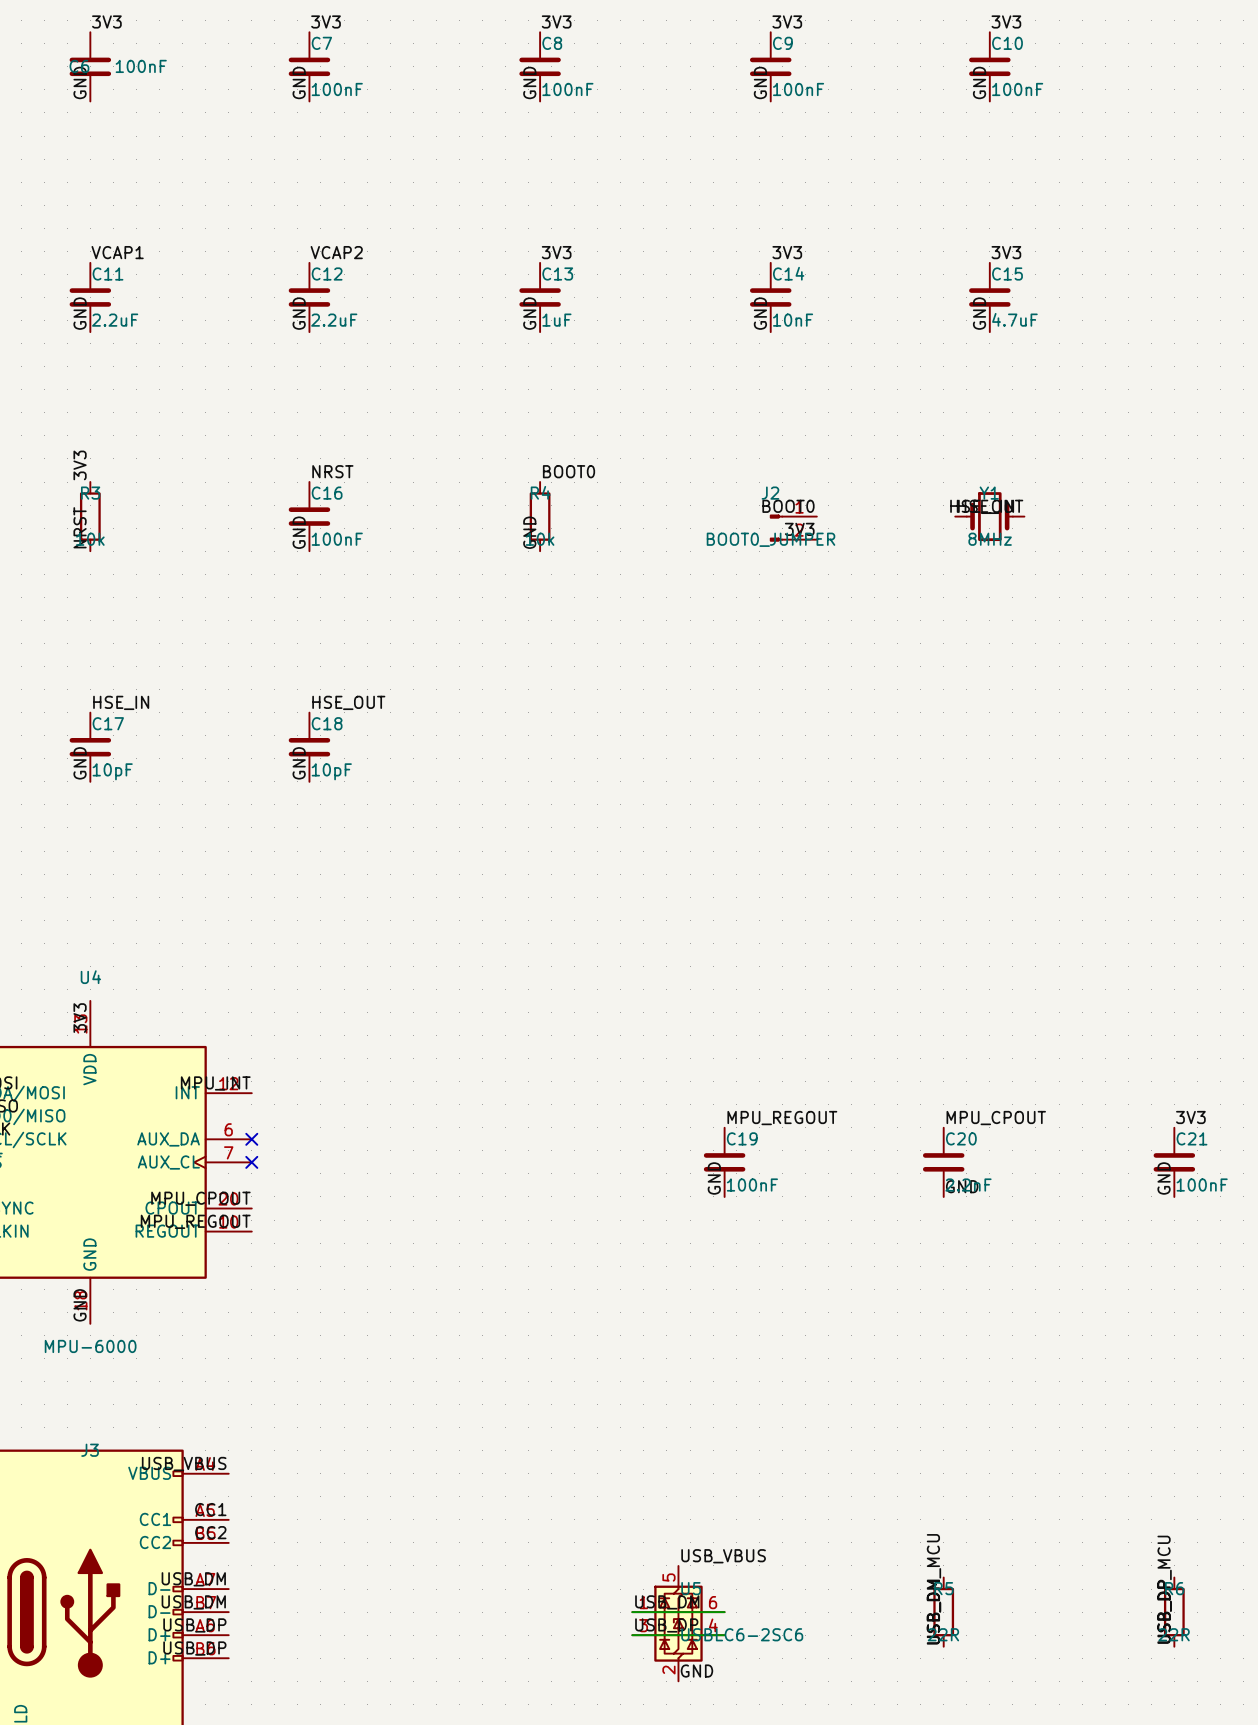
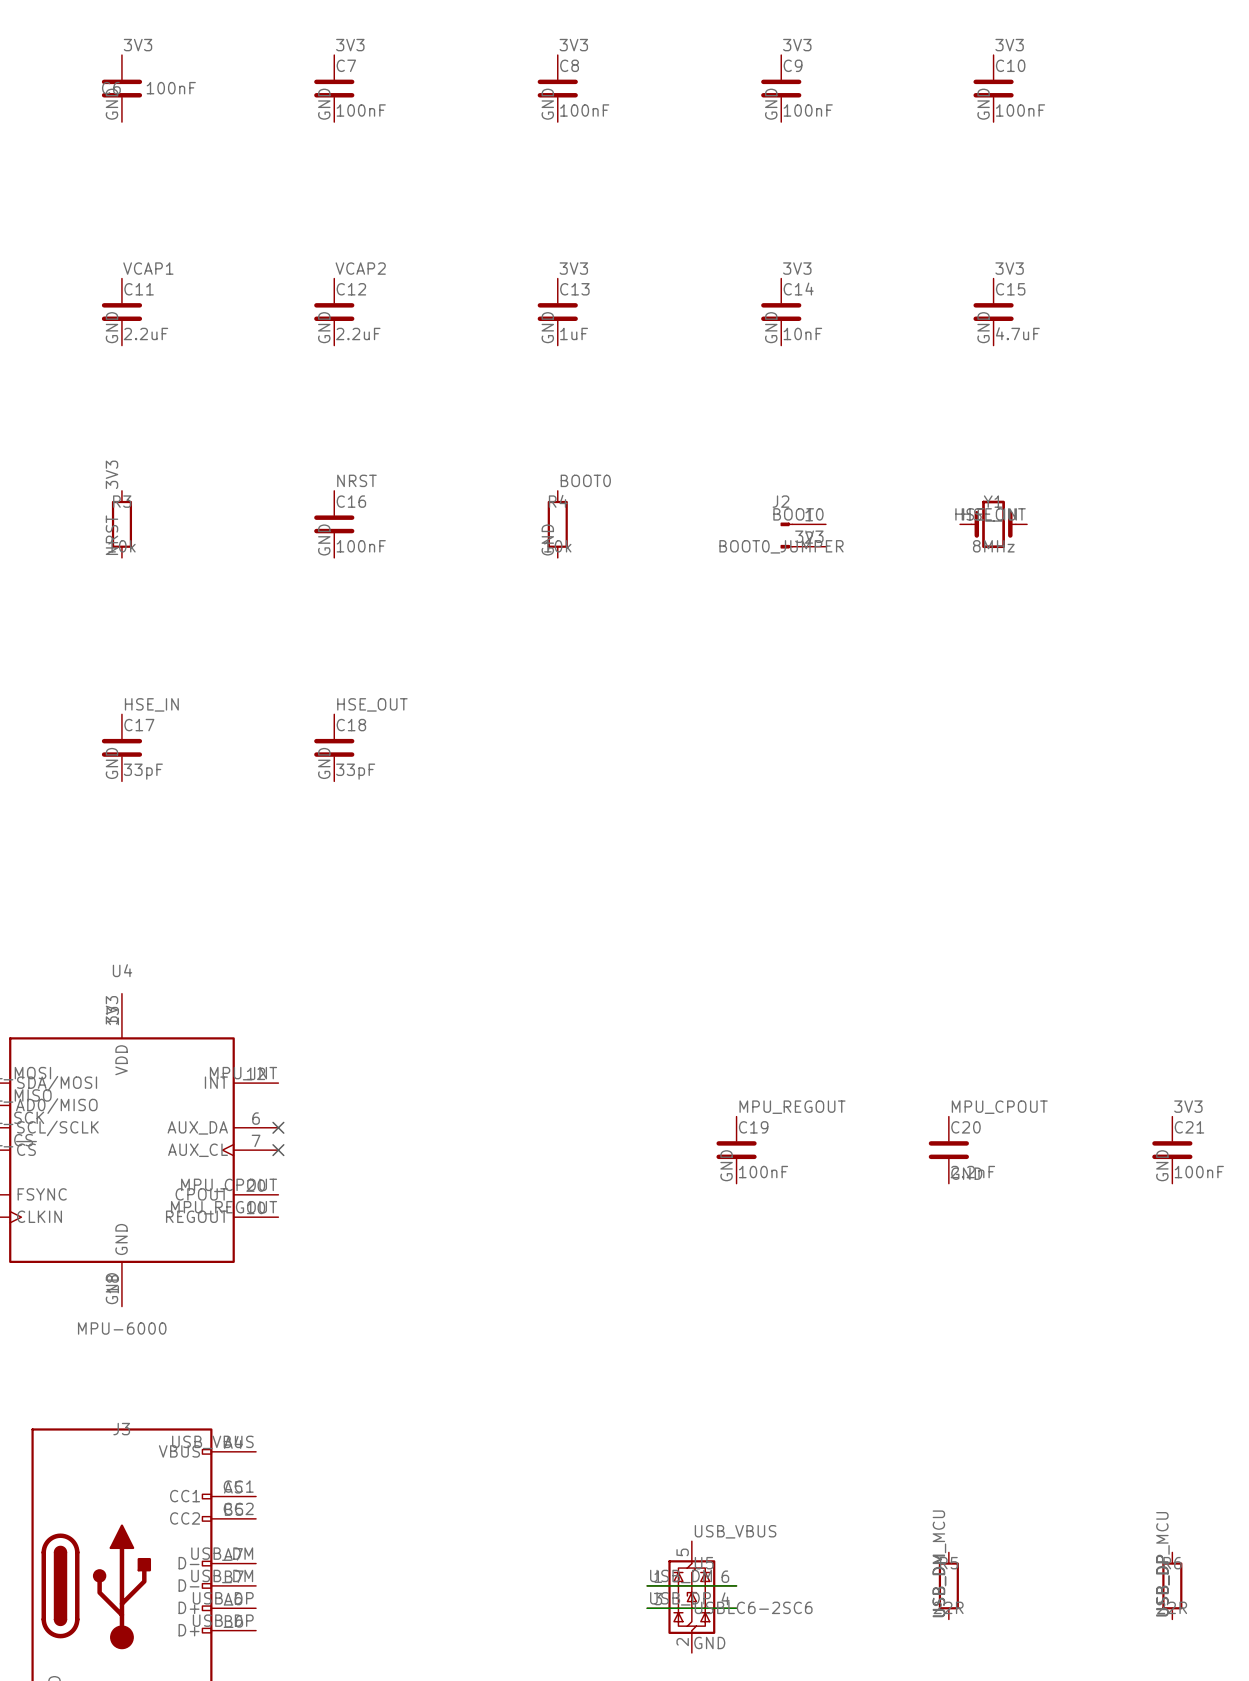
C17 value: 10pF (112, 771) -> 33pF (143, 771)
C18 value: 10pF (331, 771) -> 33pF (355, 771)

